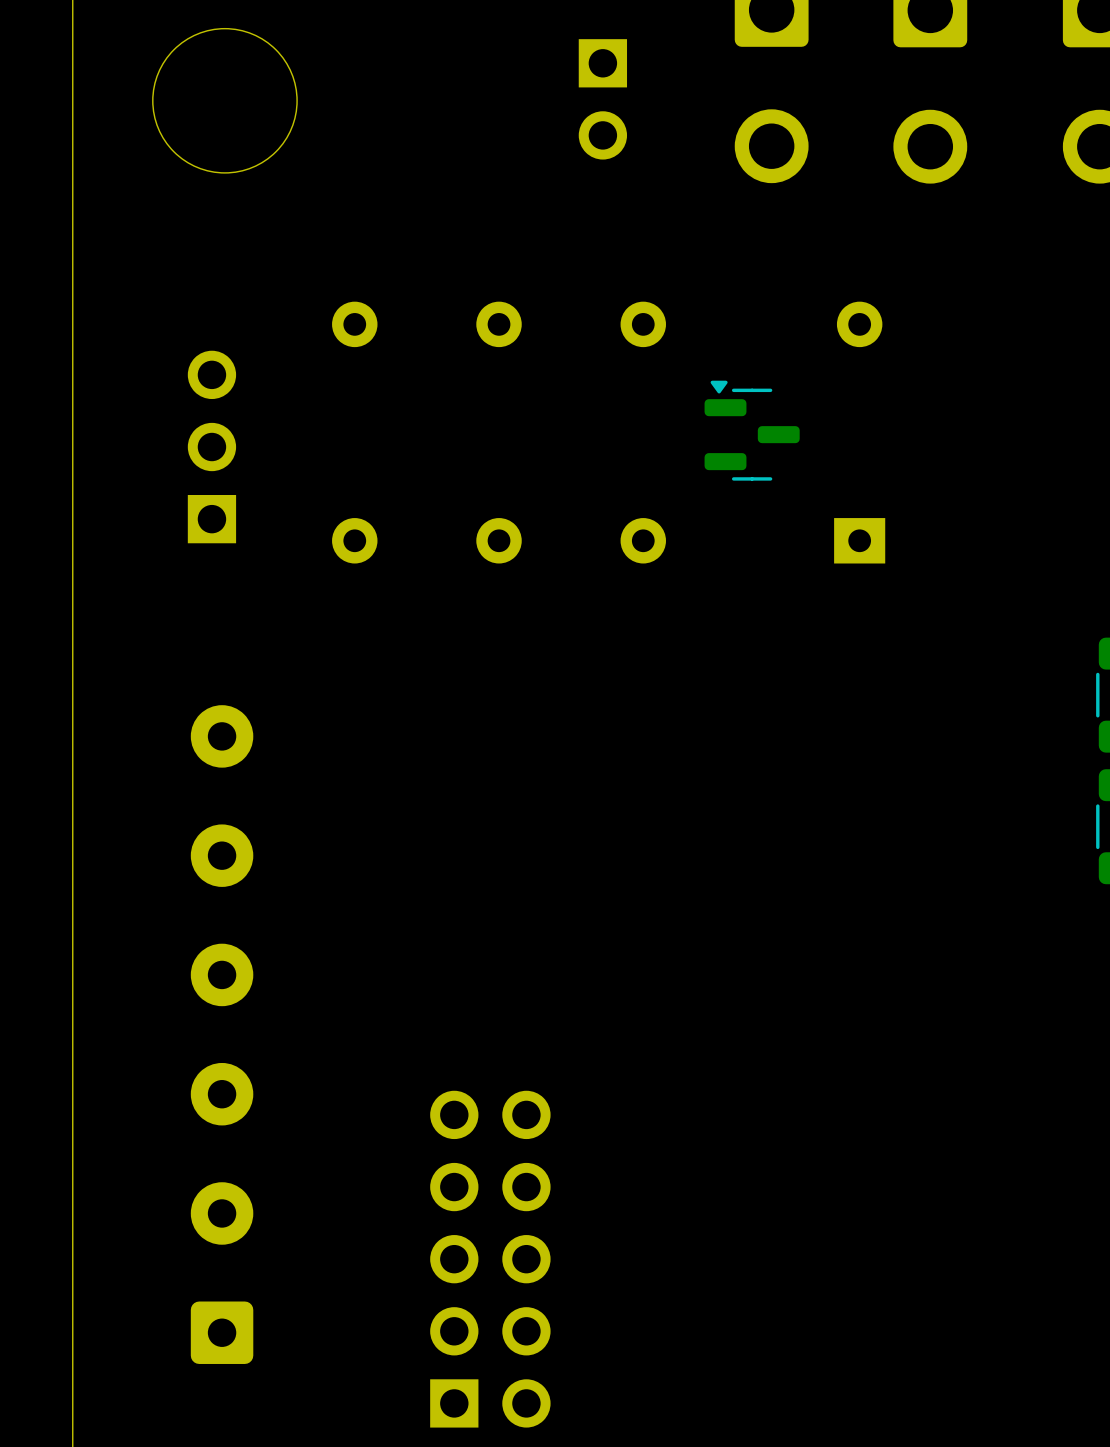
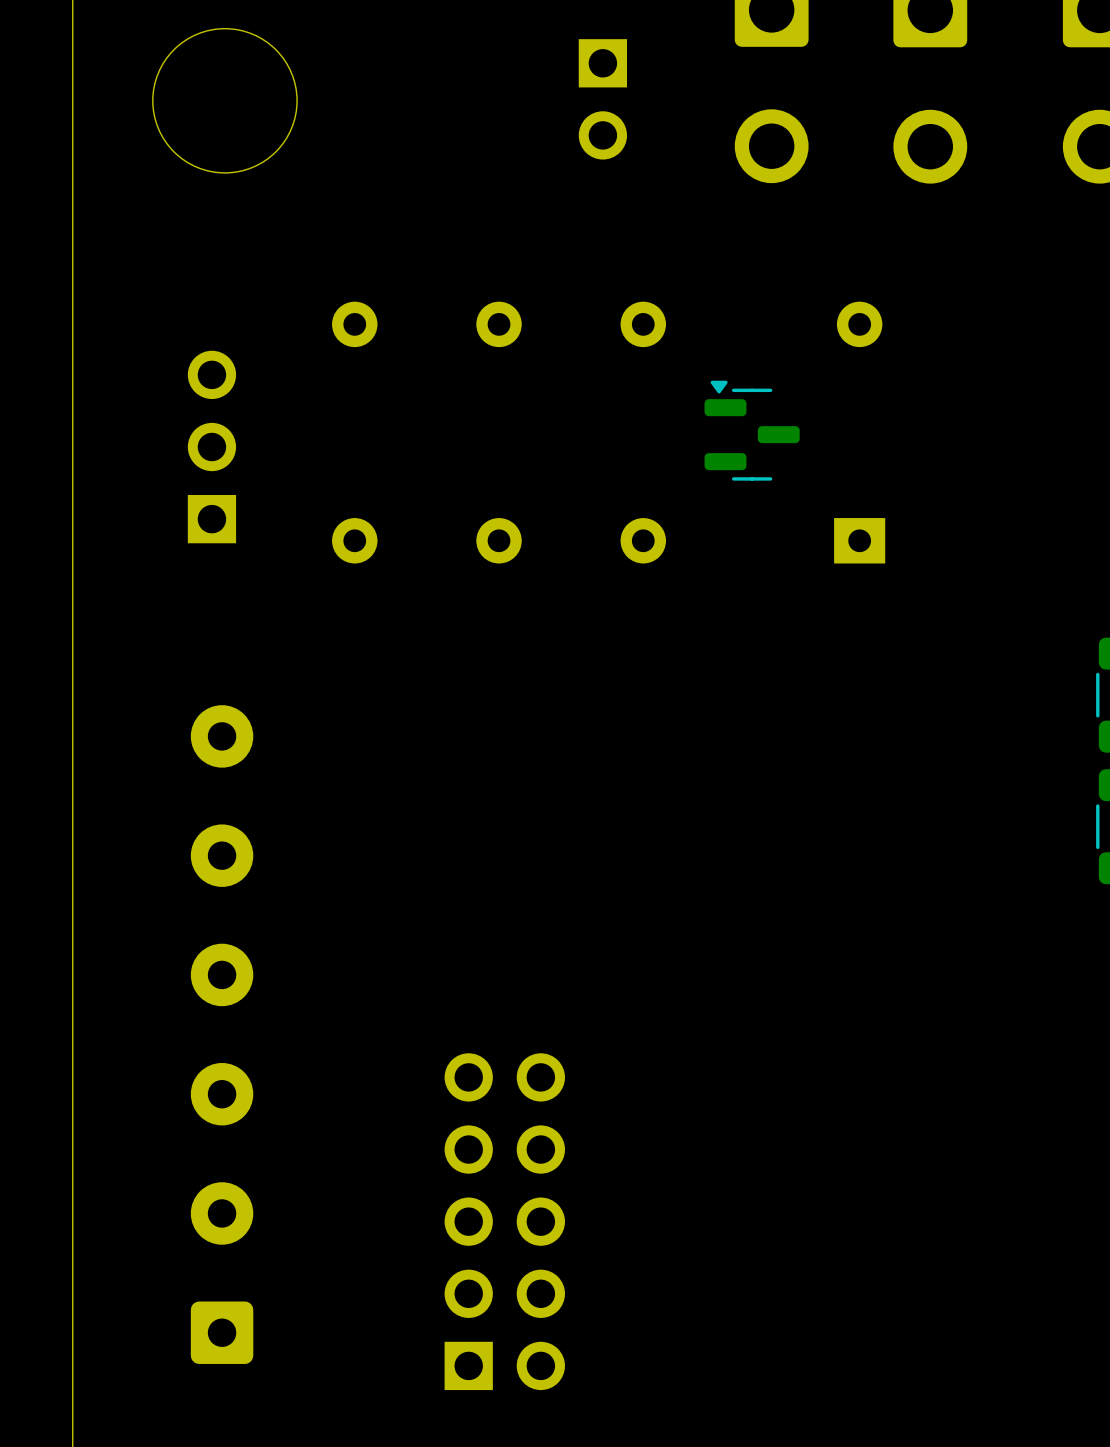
part position: (490, 1259) -> (504, 1221)

